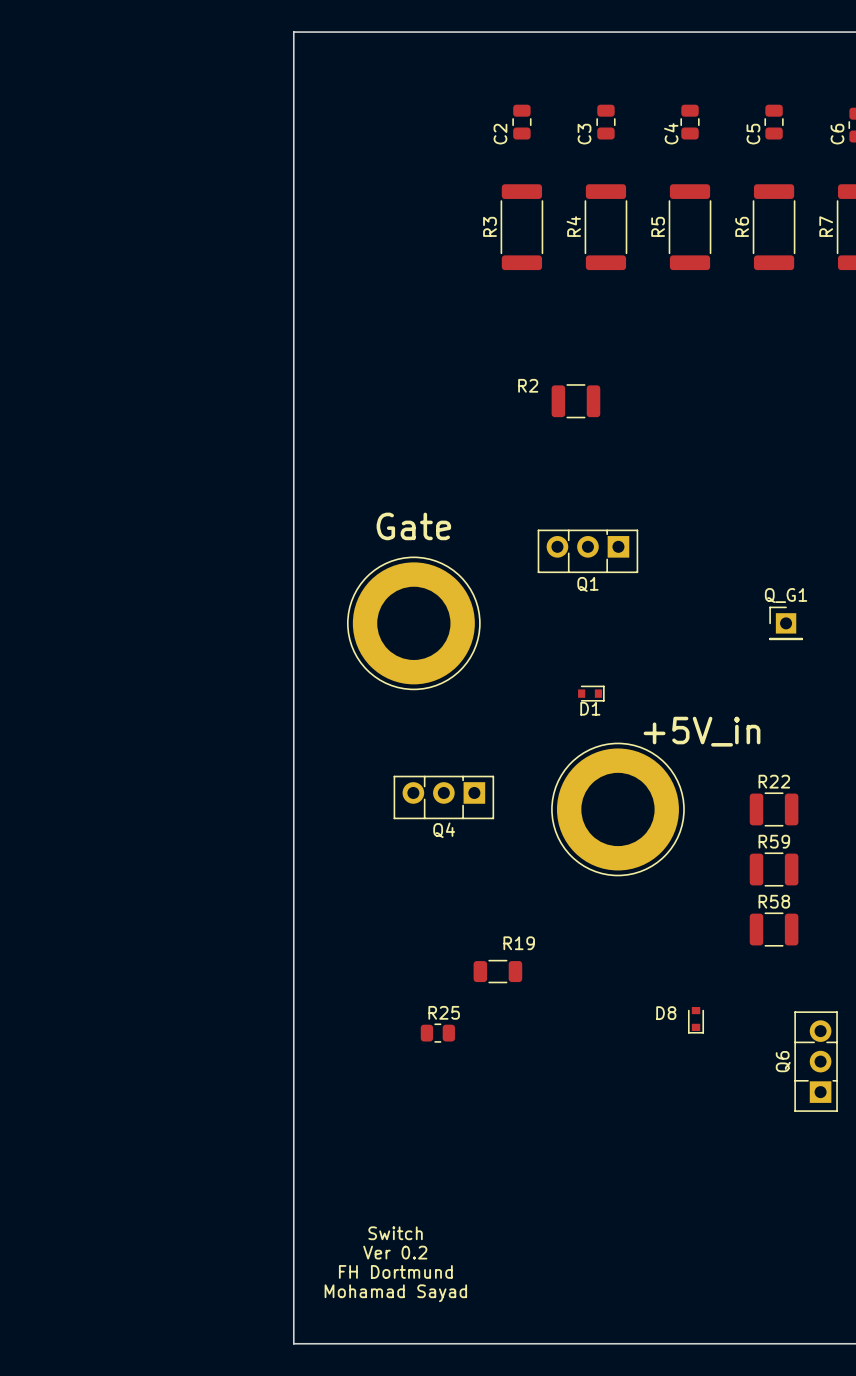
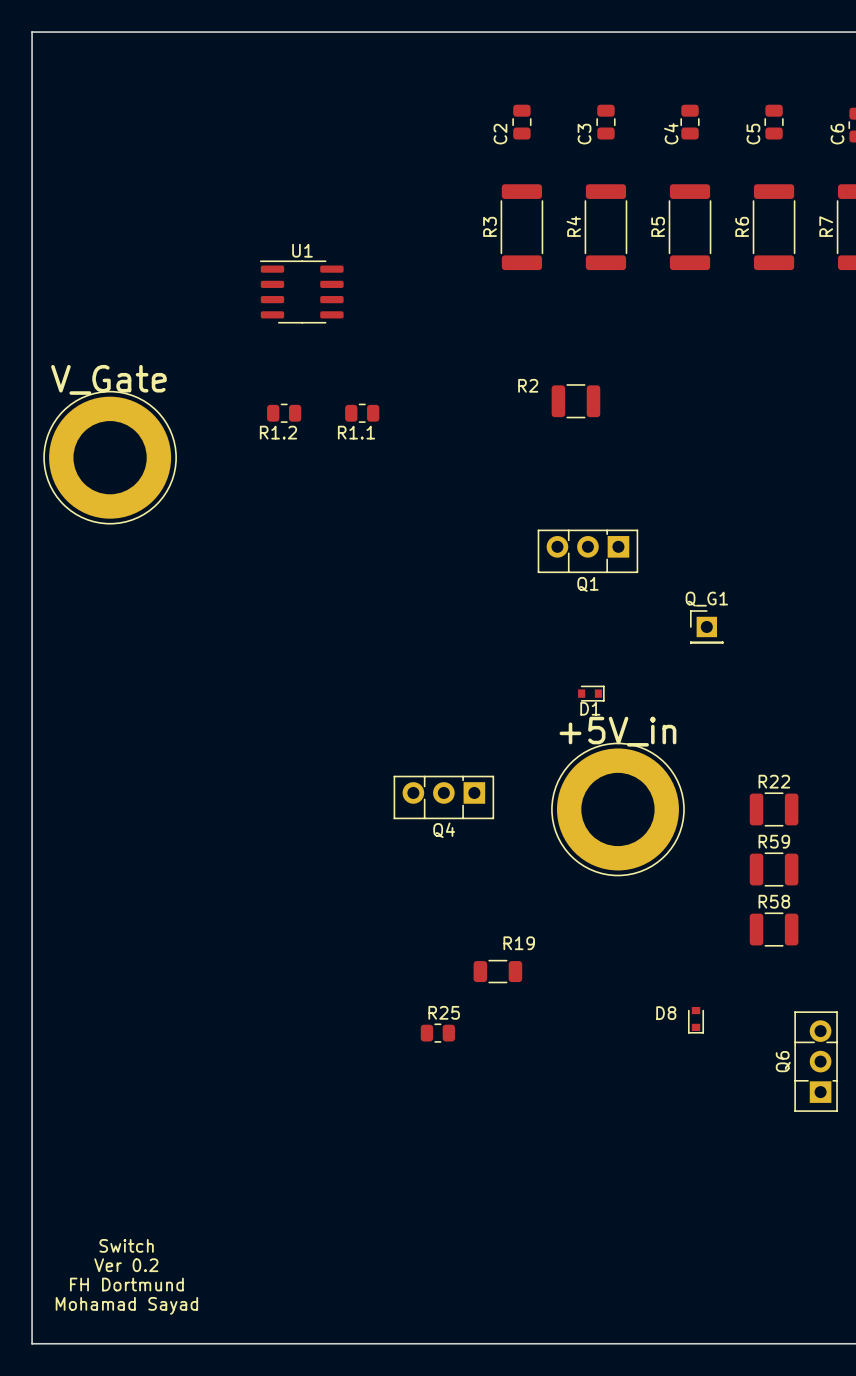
board edge: (293, 32) (293, 1343) -> (293, 32) (32, 32) (32, 1343) (293, 1343)
U1: none -> (301, 291)
R1.2: none -> (284, 413)
R1.1: none -> (362, 413)
V_Gate: none -> (110, 457)
Gate: (413, 623) -> none
Q_G1 position: (786, 623) -> (706, 626)
+5V_in name position: +5V_in (702, 731) -> +5V_in (617, 731)
text position: Switch (395, 1233) -> Switch (126, 1245)
text position: Ver 0.2 (395, 1252) -> Ver 0.2 (126, 1265)
text position: FH Dortmund (395, 1271) -> FH Dortmund (126, 1284)
text position: Mohamad Sayad (395, 1293) -> Mohamad Sayad (126, 1305)

